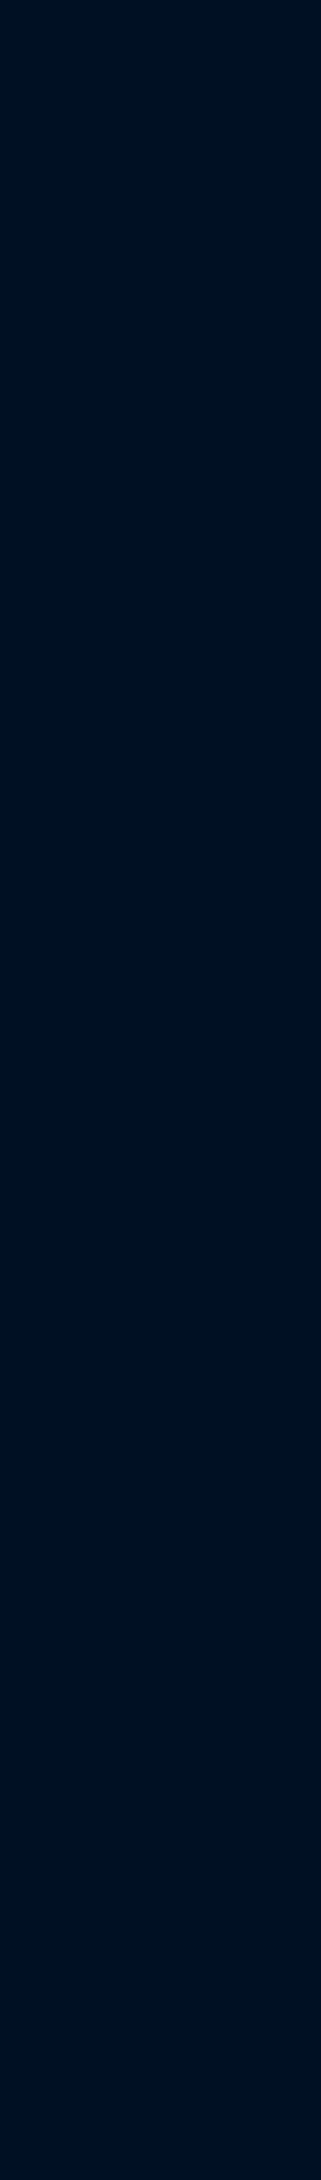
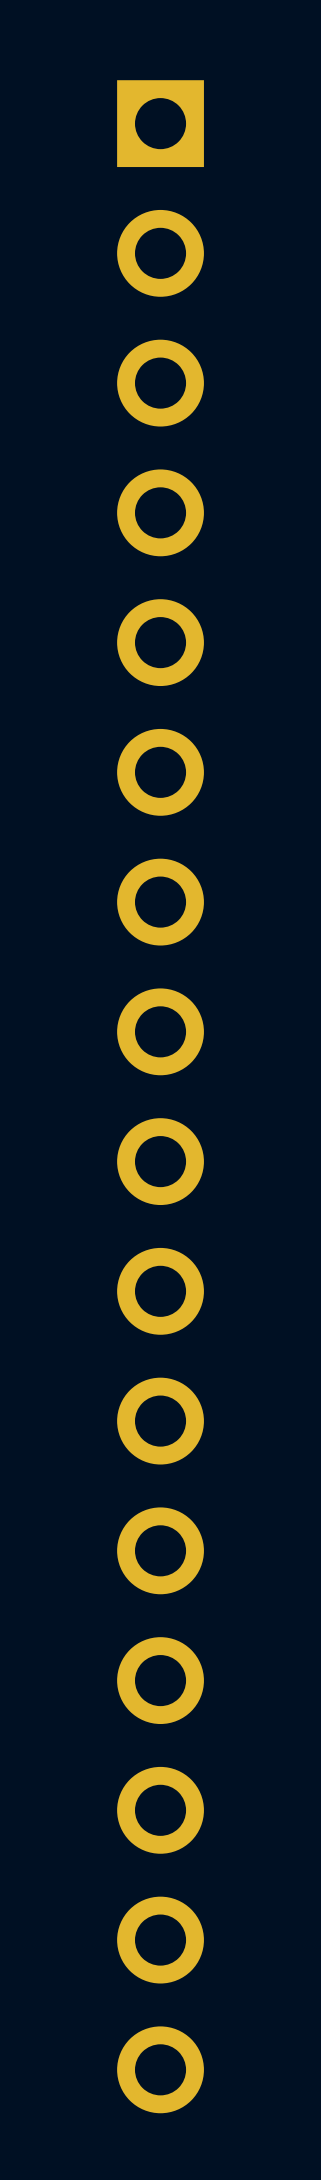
part: none -> (160, 1096)

